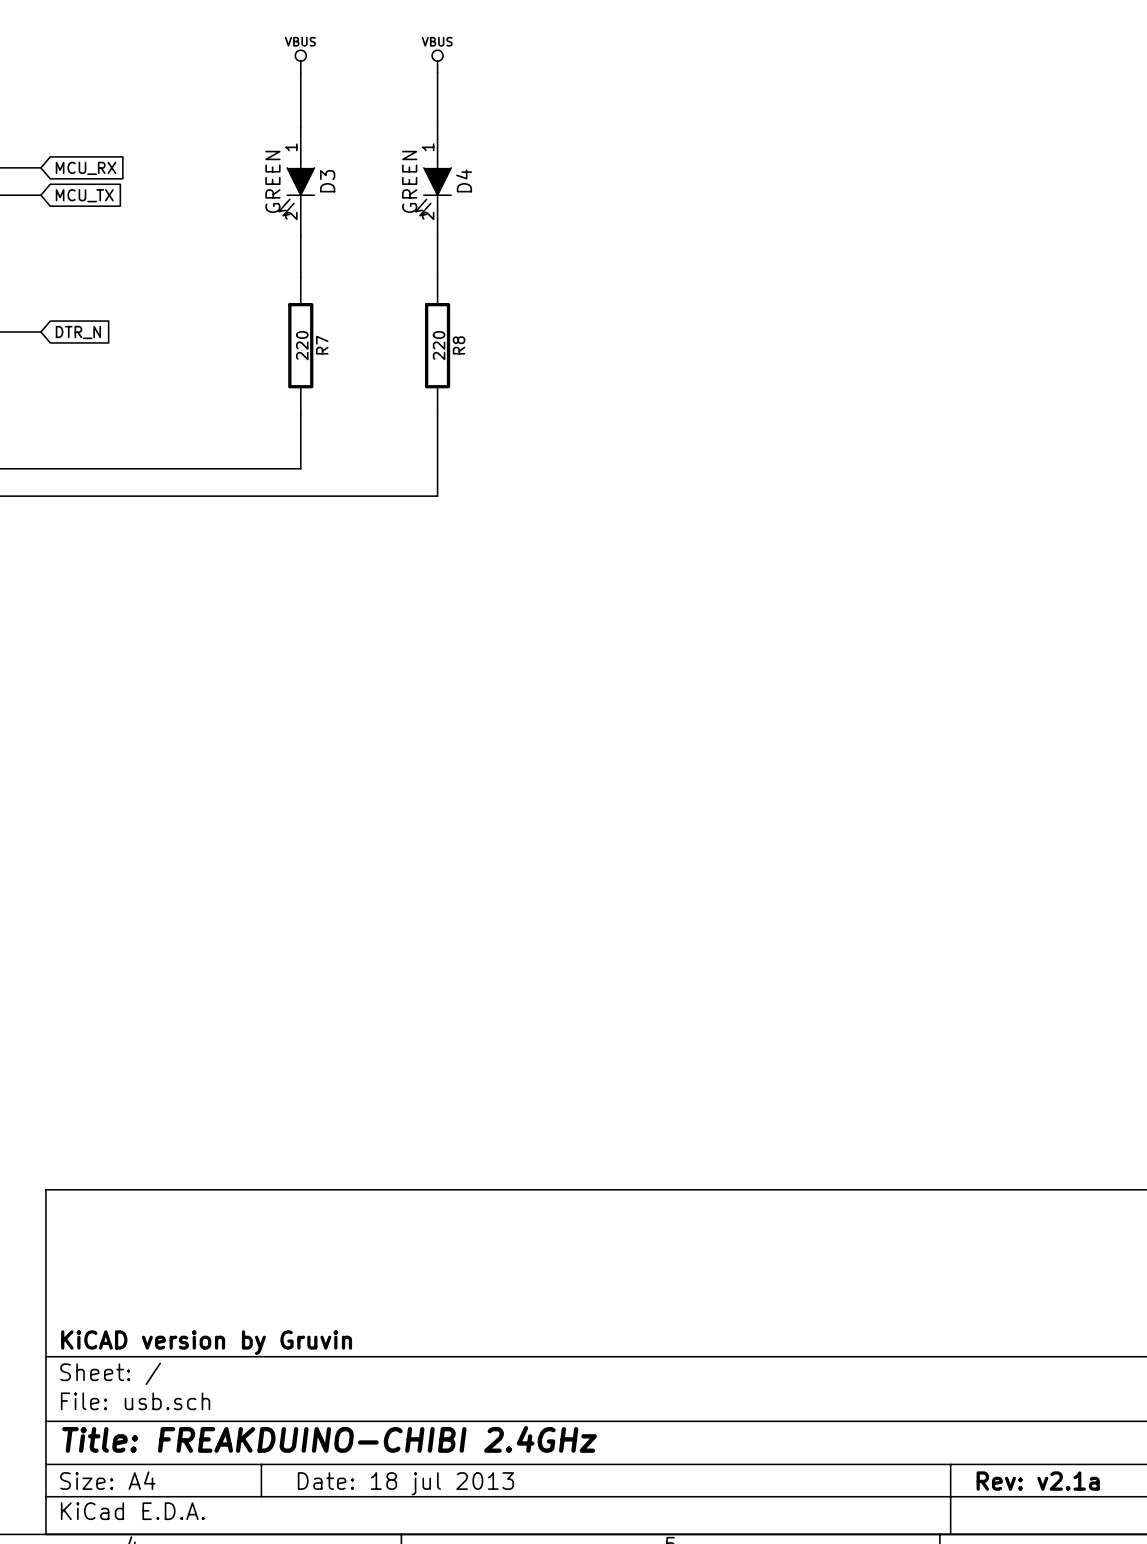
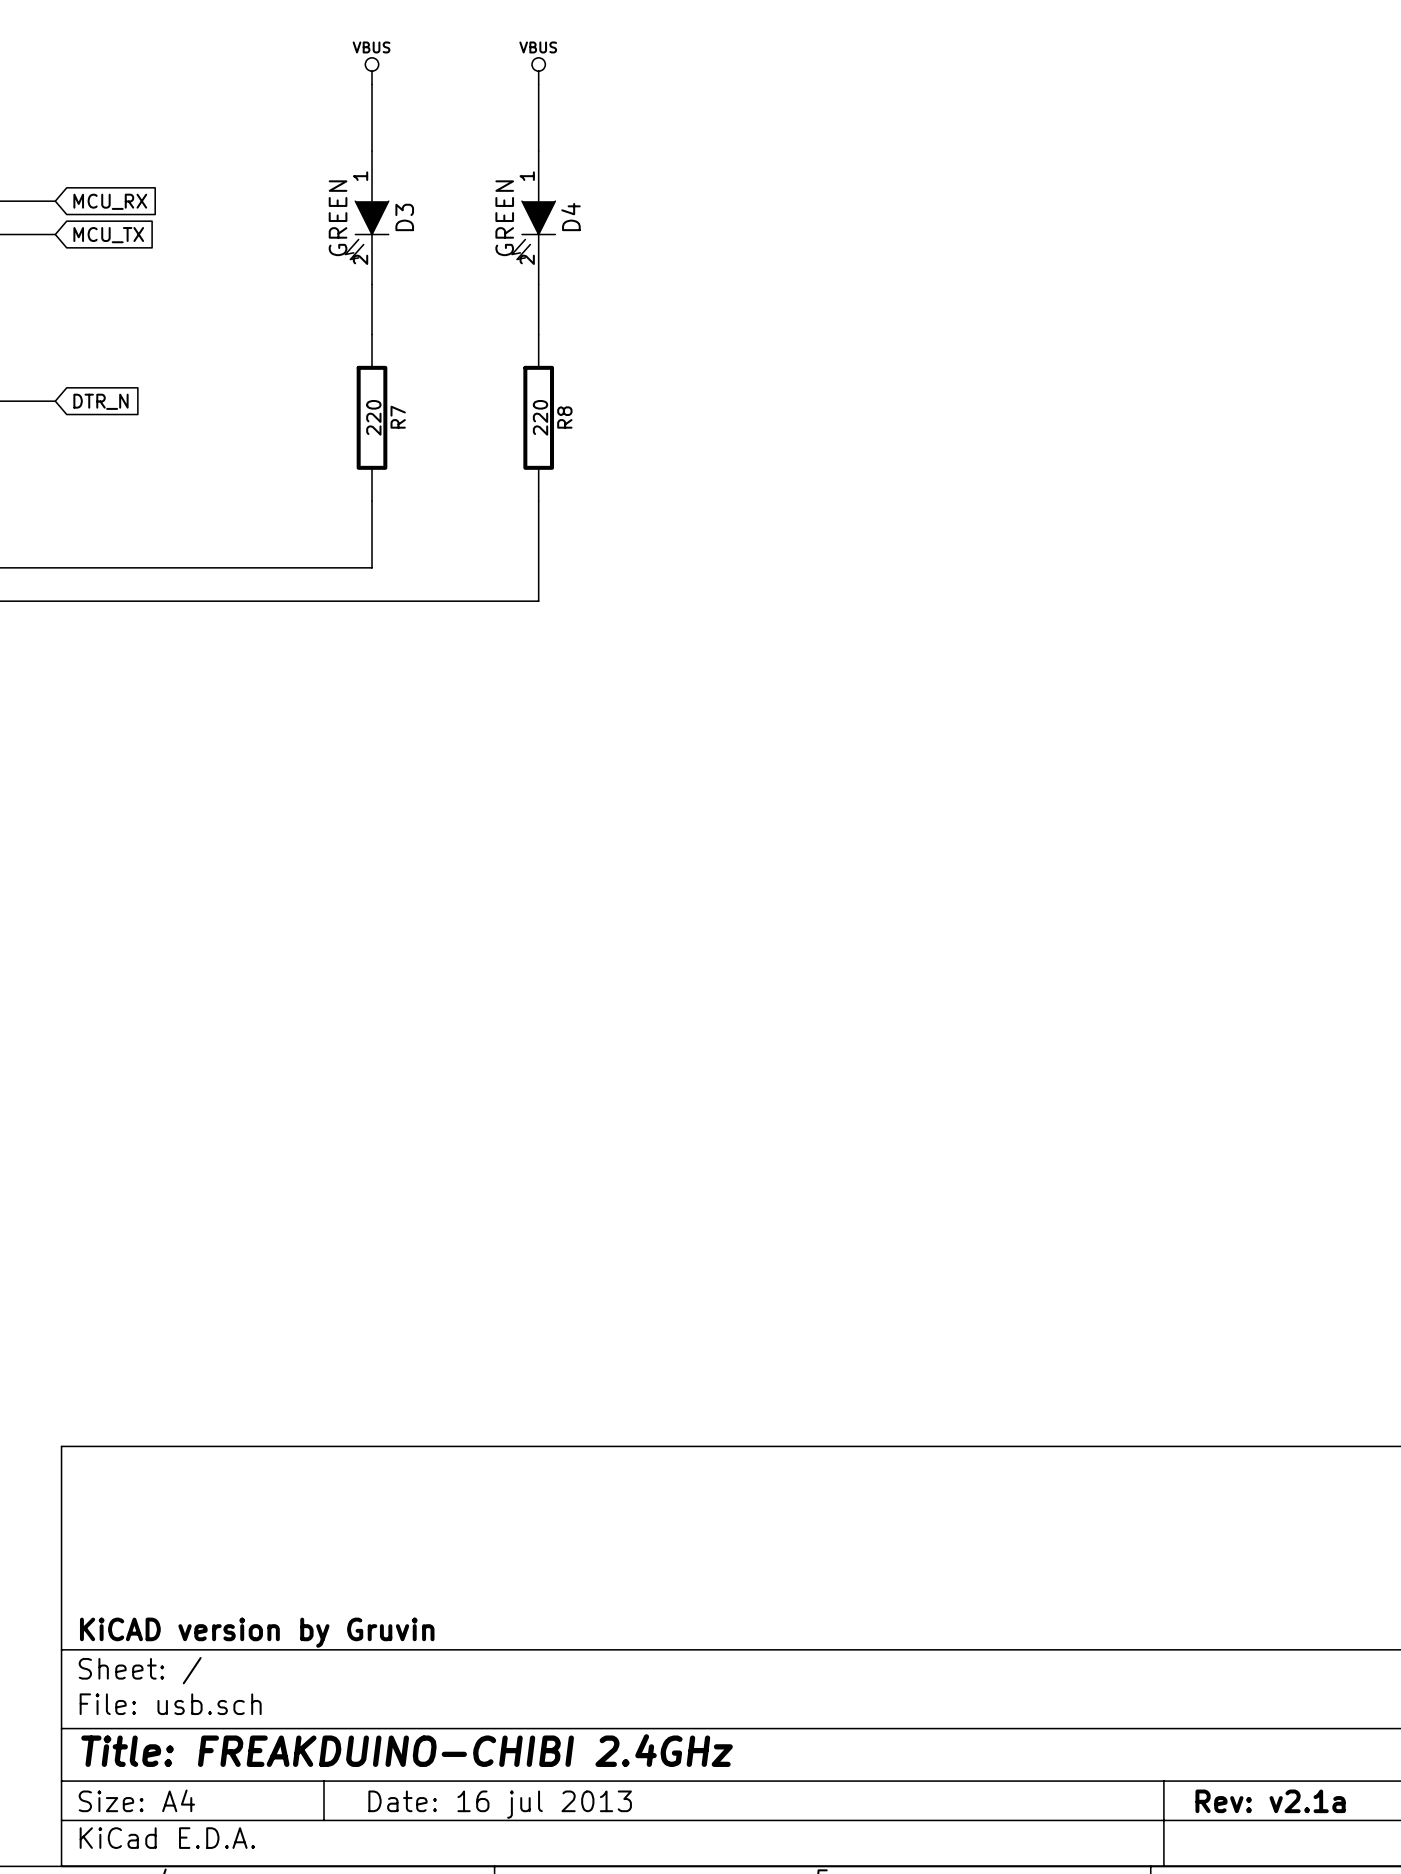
title block: Date: 18 jul 2013 (405, 1483) -> Date: 16 jul 2013 (500, 1804)

